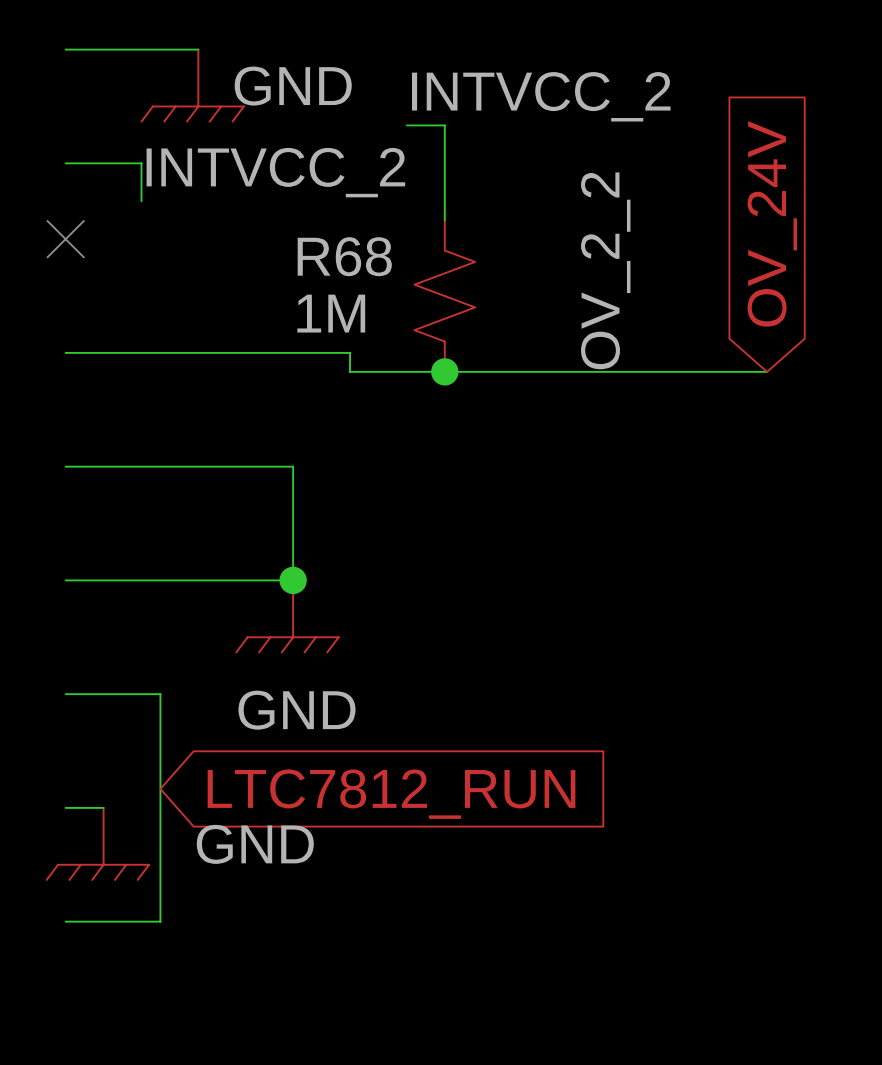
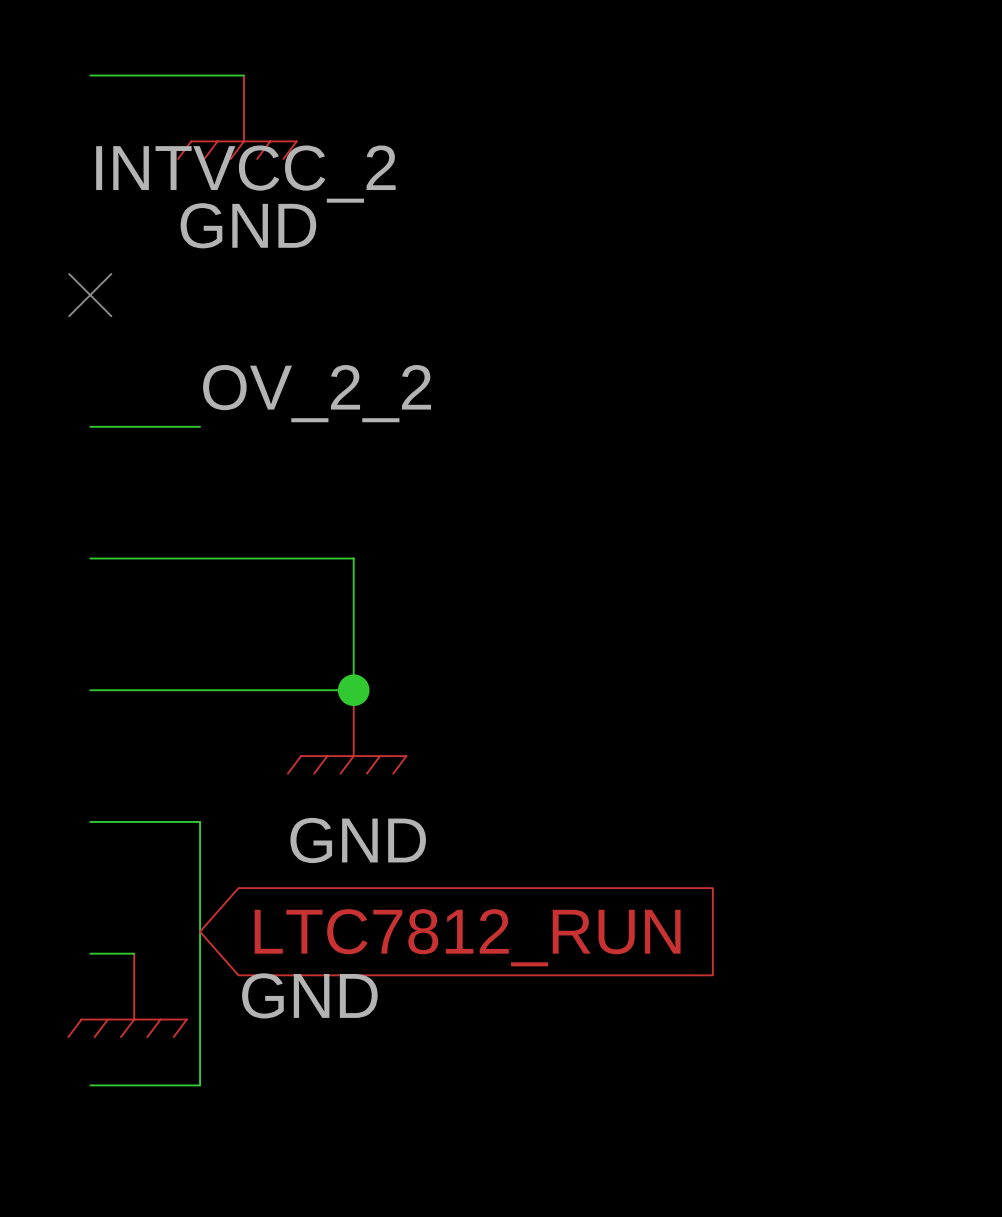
power symbol text position: GND (293, 86) -> GND (248, 225)
label: INTVCC_2 (541, 96) -> none
wire: (406, 125) (444, 125) (444, 220) -> none
wire: (65, 163) (141, 163) (141, 201) -> none
label position: INTVCC_2 (275, 172) -> INTVCC_2 (245, 174)
global label: OV_24V (772, 223) -> none
label rotation: 0° (605, 270) -> 90° clockwise (317, 393)
label position: OV_2_2 (605, 270) -> OV_2_2 (317, 393)
R68: (444, 296) -> none
wire: (160, 352) (350, 352) (350, 371) (767, 371) -> none
junction: (444, 371) -> none

